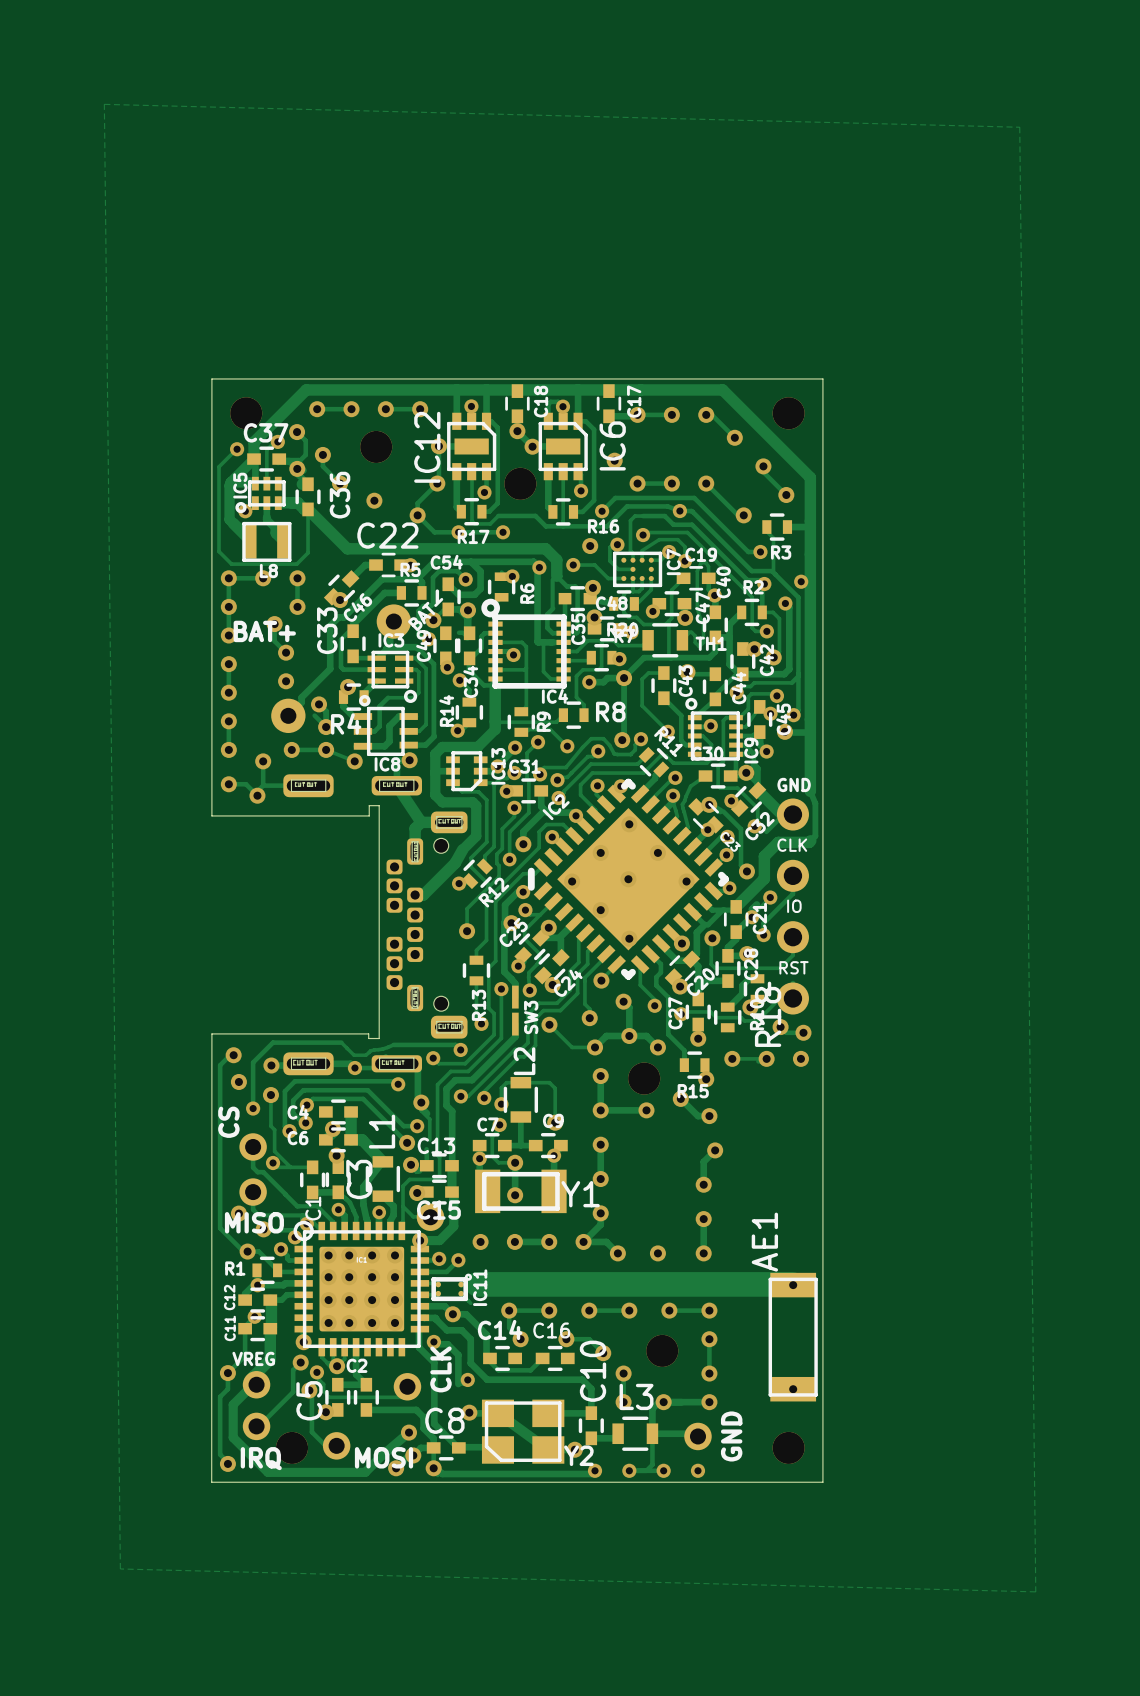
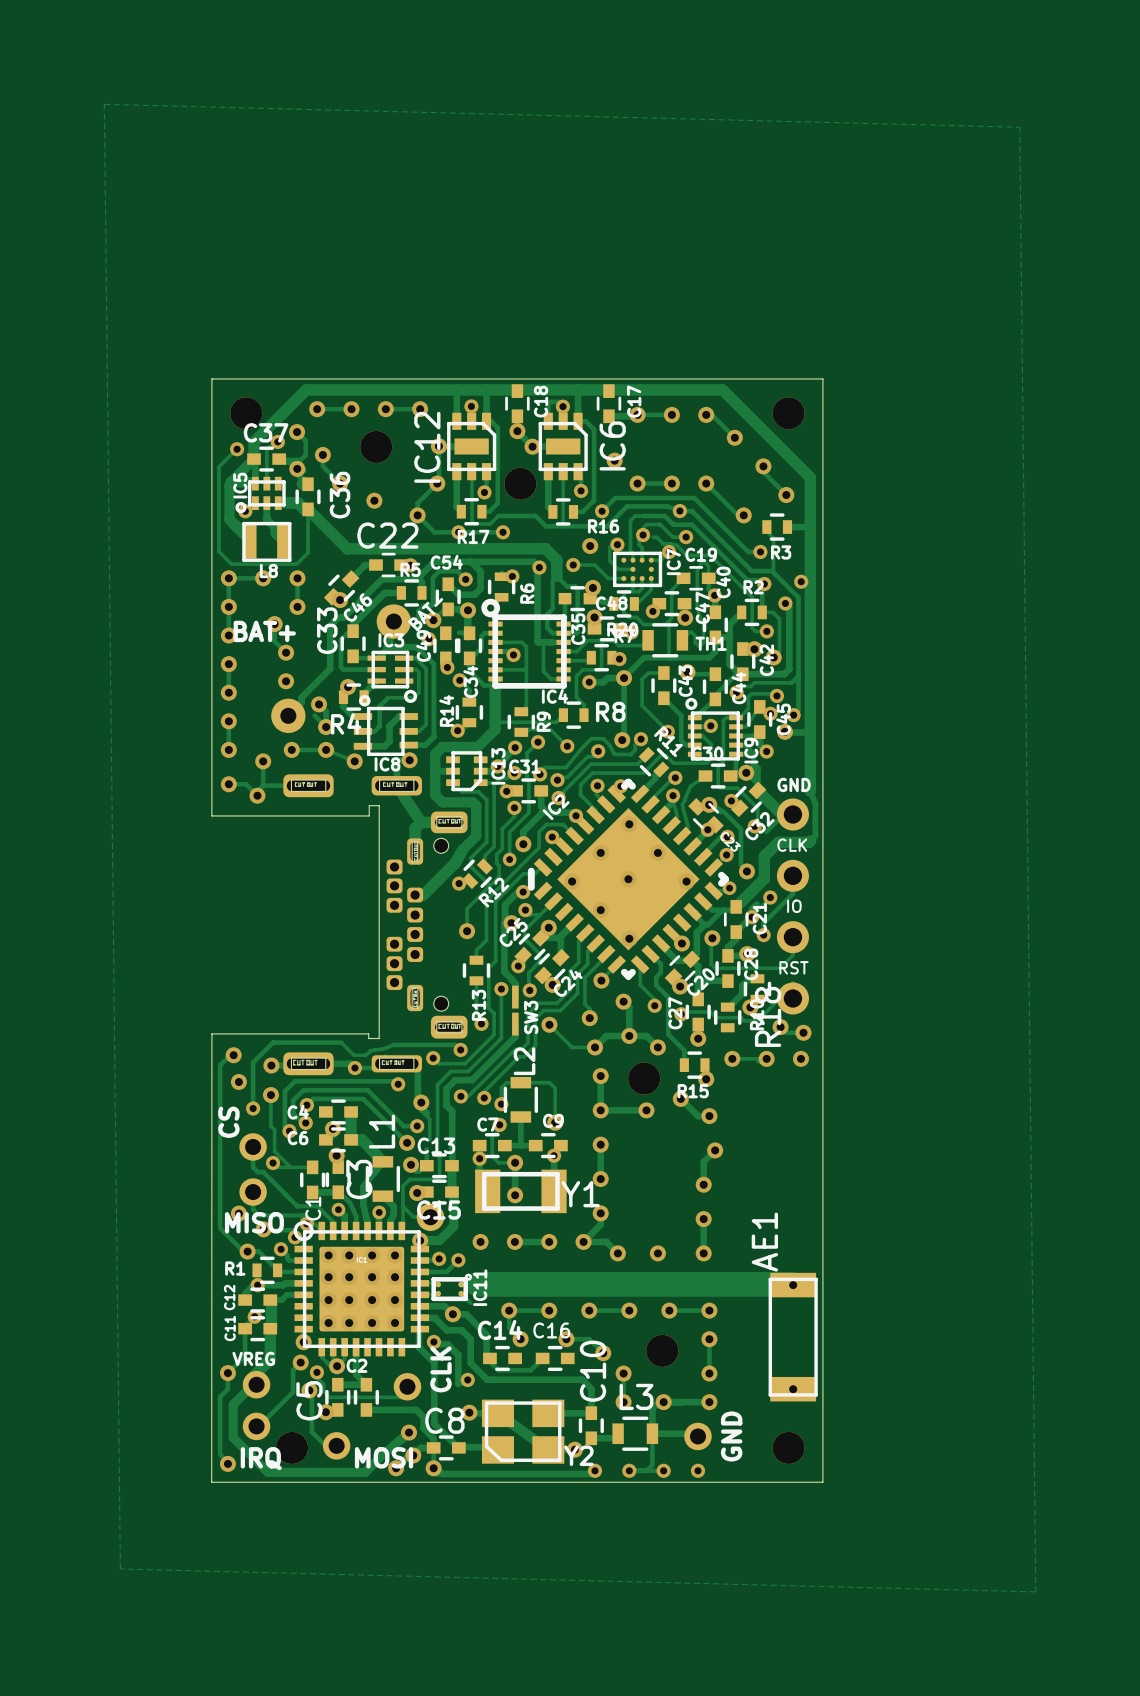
track: (643, 535) (645, 532) (687, 532) (710, 555) -> (653, 537) (656, 537) (663, 543) (676, 545) (686, 555) (710, 555)
track: (642, 550) (659, 539) (677, 539) (684, 546) (684, 561) -> (642, 550) (638, 544) (638, 532) (646, 524) (660, 524) (672, 537) (686, 537)
via position: (684, 561) -> (686, 537)

